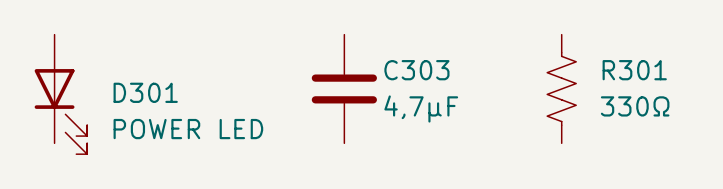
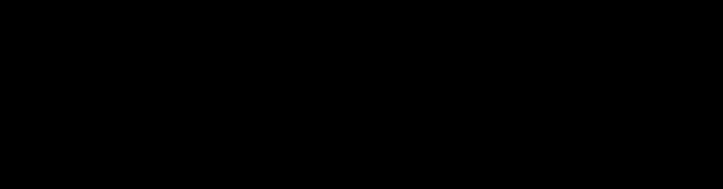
C303: 4,7µF (344, 88) -> none
R301: 330Ω (561, 88) -> none
D301: POWER LED (60, 94) -> none

